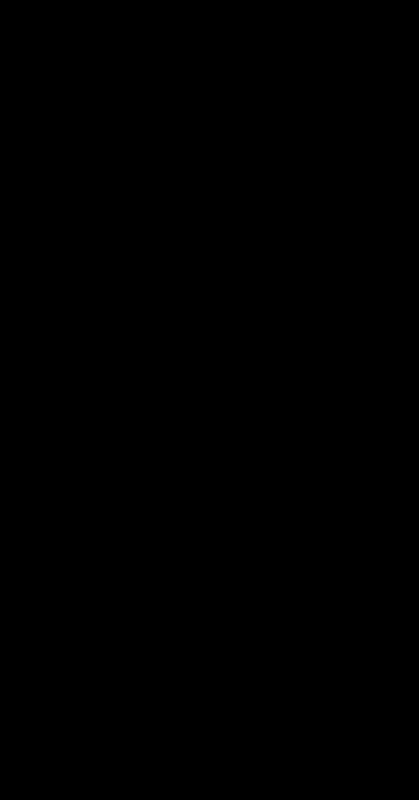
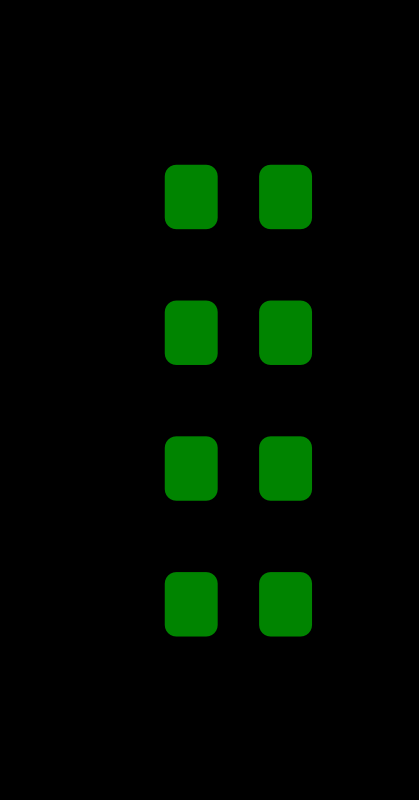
part: none -> (238, 196)
part: none -> (238, 332)
part: none -> (238, 468)
part: none -> (238, 604)

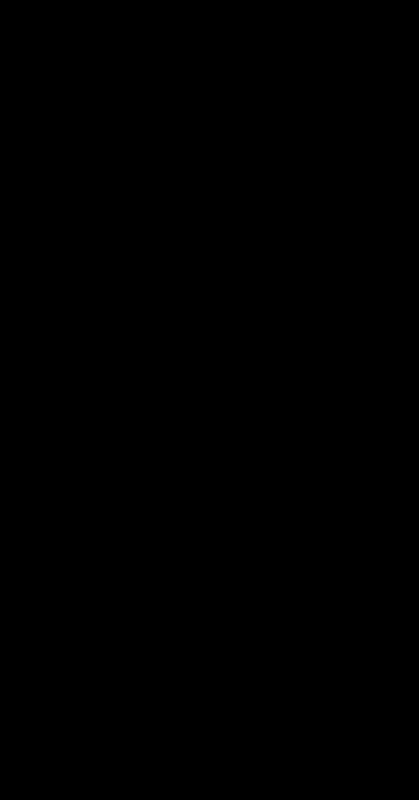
part: (238, 196) -> none
part: (238, 332) -> none
part: (238, 468) -> none
part: (238, 604) -> none

